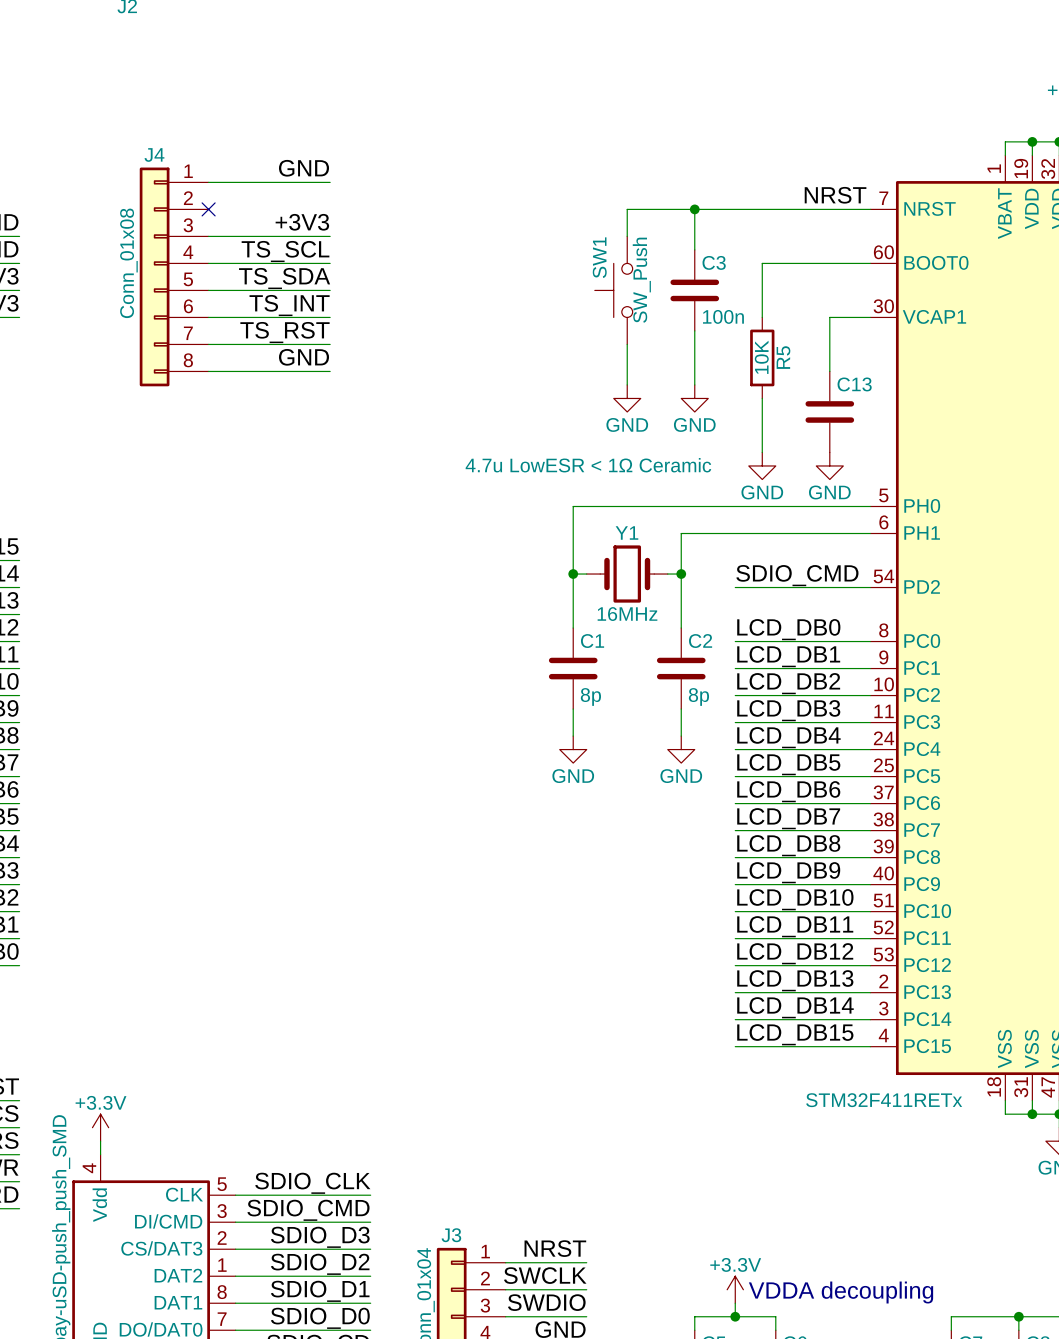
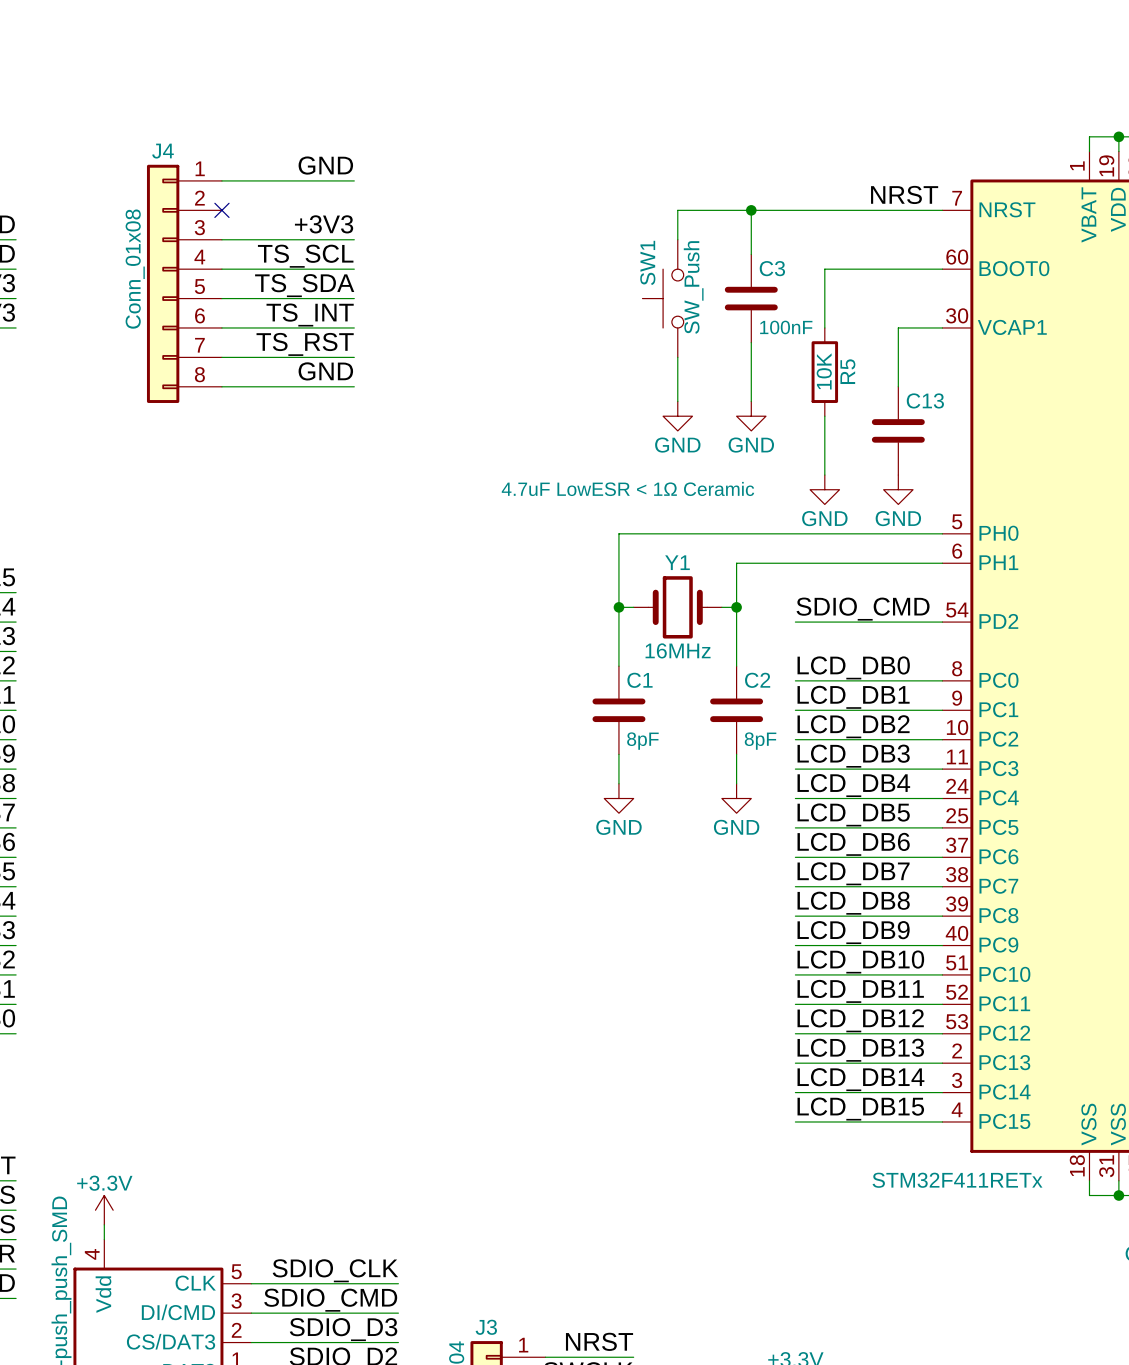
C3 value: 100n (723, 316) -> 100nF (786, 327)
C13 value: 4.7u LowESR < 1Ω Ceramic (588, 465) -> 4.7uF LowESR < 1Ω Ceramic (627, 488)
C1 value: 8p (590, 696) -> 8pF (642, 741)
C2 value: 8p (698, 696) -> 8pF (760, 741)

